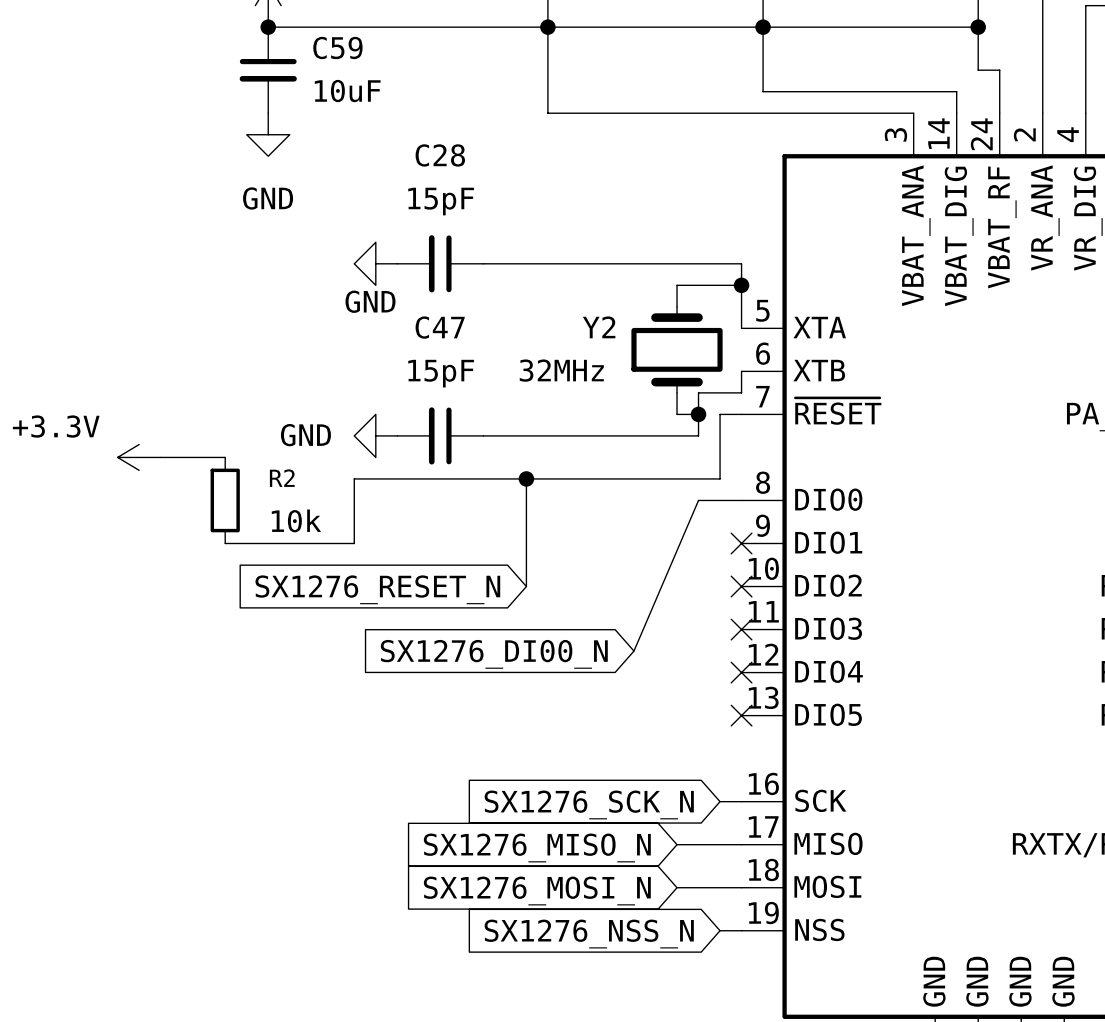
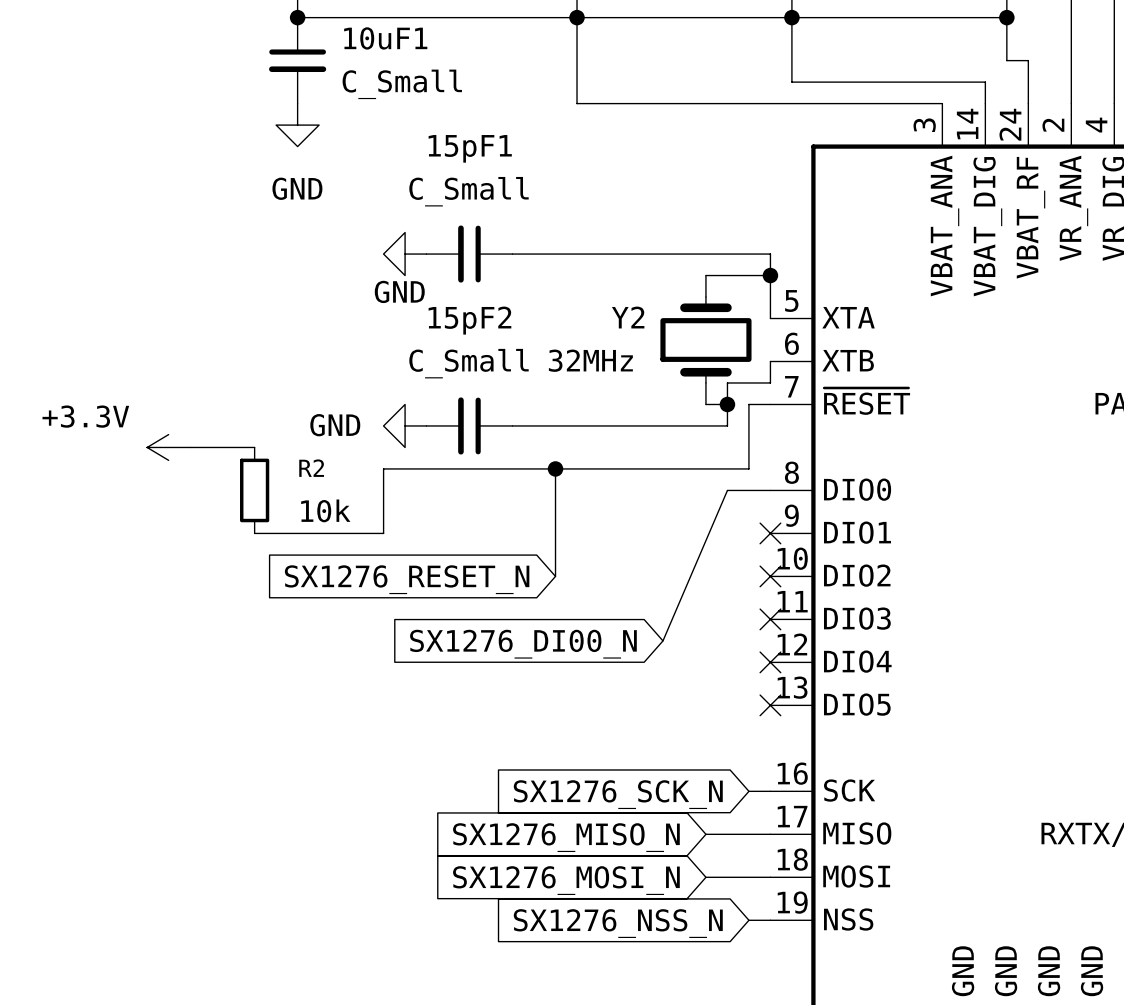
C59 name: C59 (337, 47) -> 10uF1 (385, 38)
C59 value: 10uF (347, 91) -> C_Small (402, 84)
C28 name: C28 (440, 155) -> 15pF1 (470, 148)
C28 value: 15pF (441, 201) -> C_Small (469, 191)
C47 name: C47 (440, 327) -> 15pF2 (469, 320)
C47 value: 15pF (441, 373) -> C_Small (469, 363)

